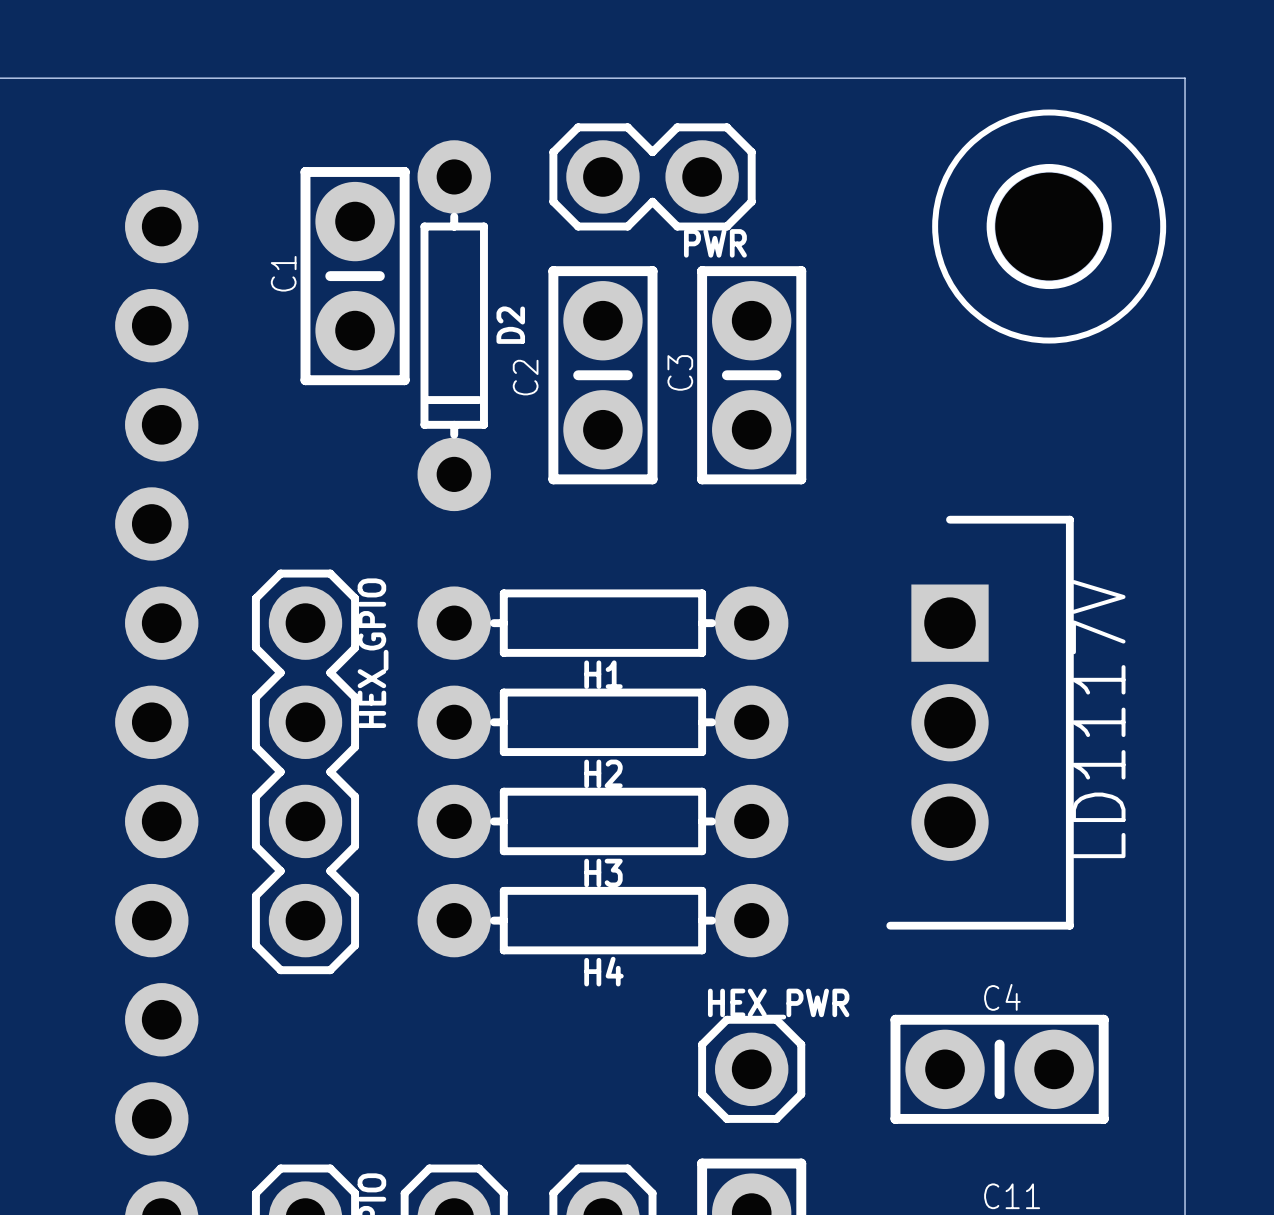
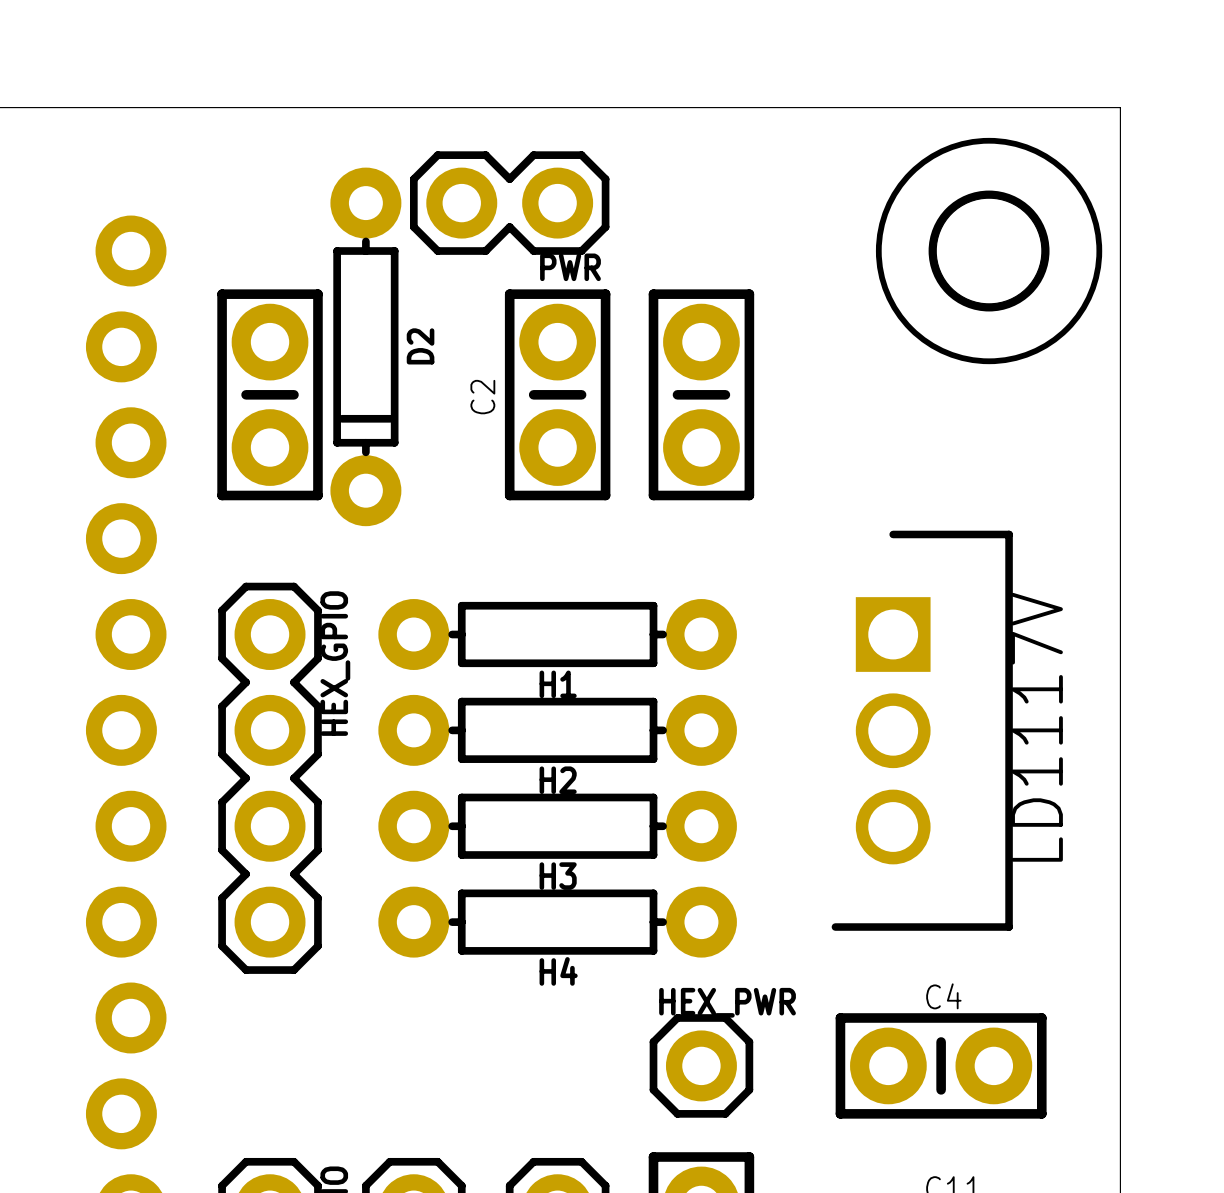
PWR position: (652, 176) -> (509, 203)
C1: (355, 276) -> none
D2 position: (454, 325) -> (365, 346)
C3 name: C3 (680, 372) -> none
part: none -> (270, 394)

